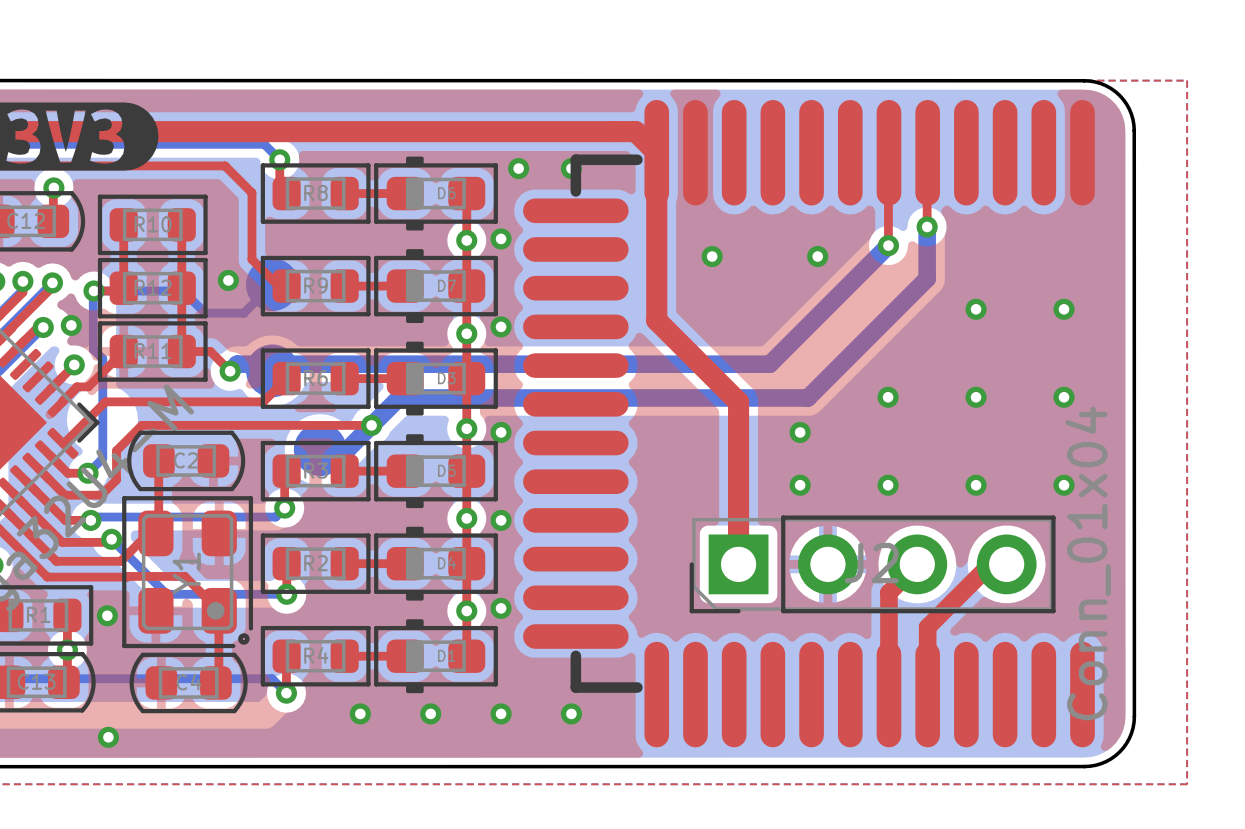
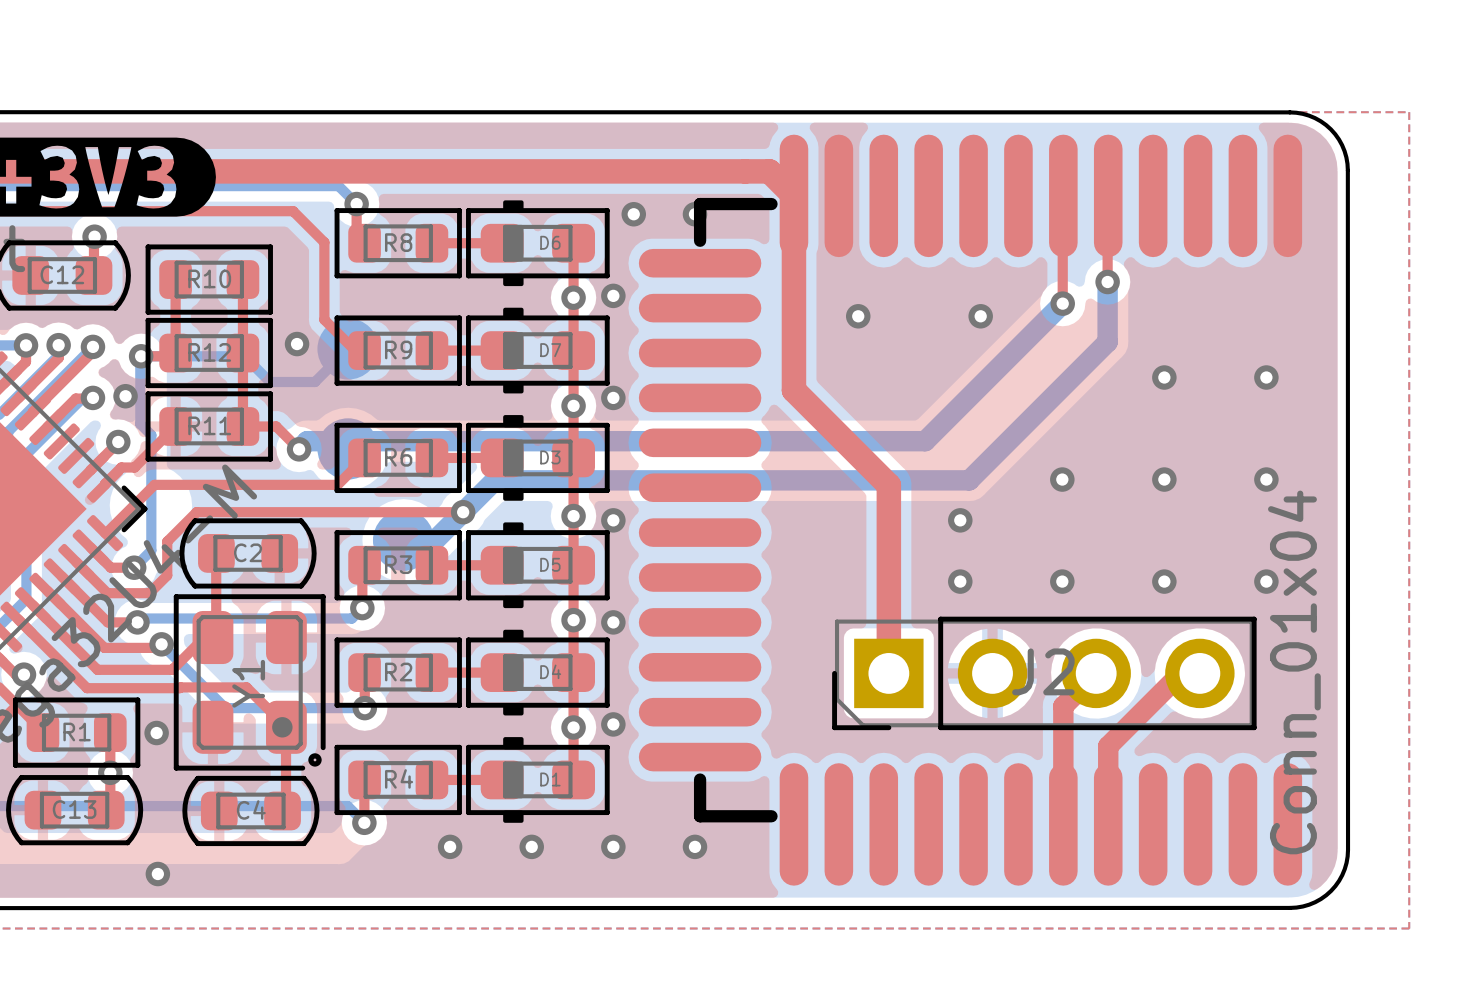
via: (71, 325) -> none
via: none -> (125, 396)
via: none -> (92, 397)
via: (43, 327) -> none

